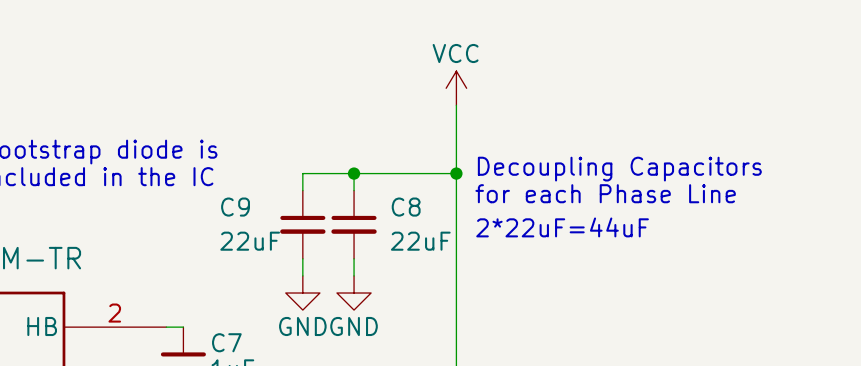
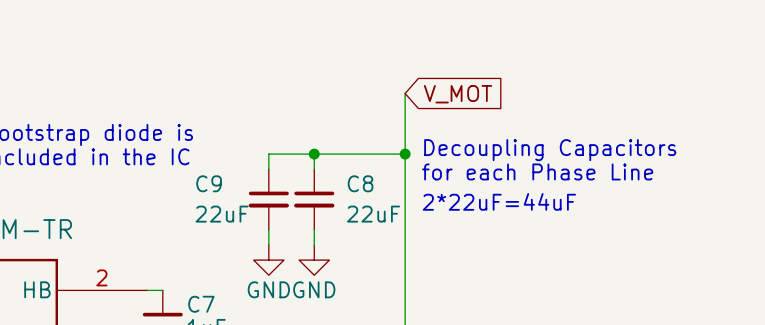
power symbol: VCC (456, 88) -> none
global label: none -> V_MOT (458, 94)

